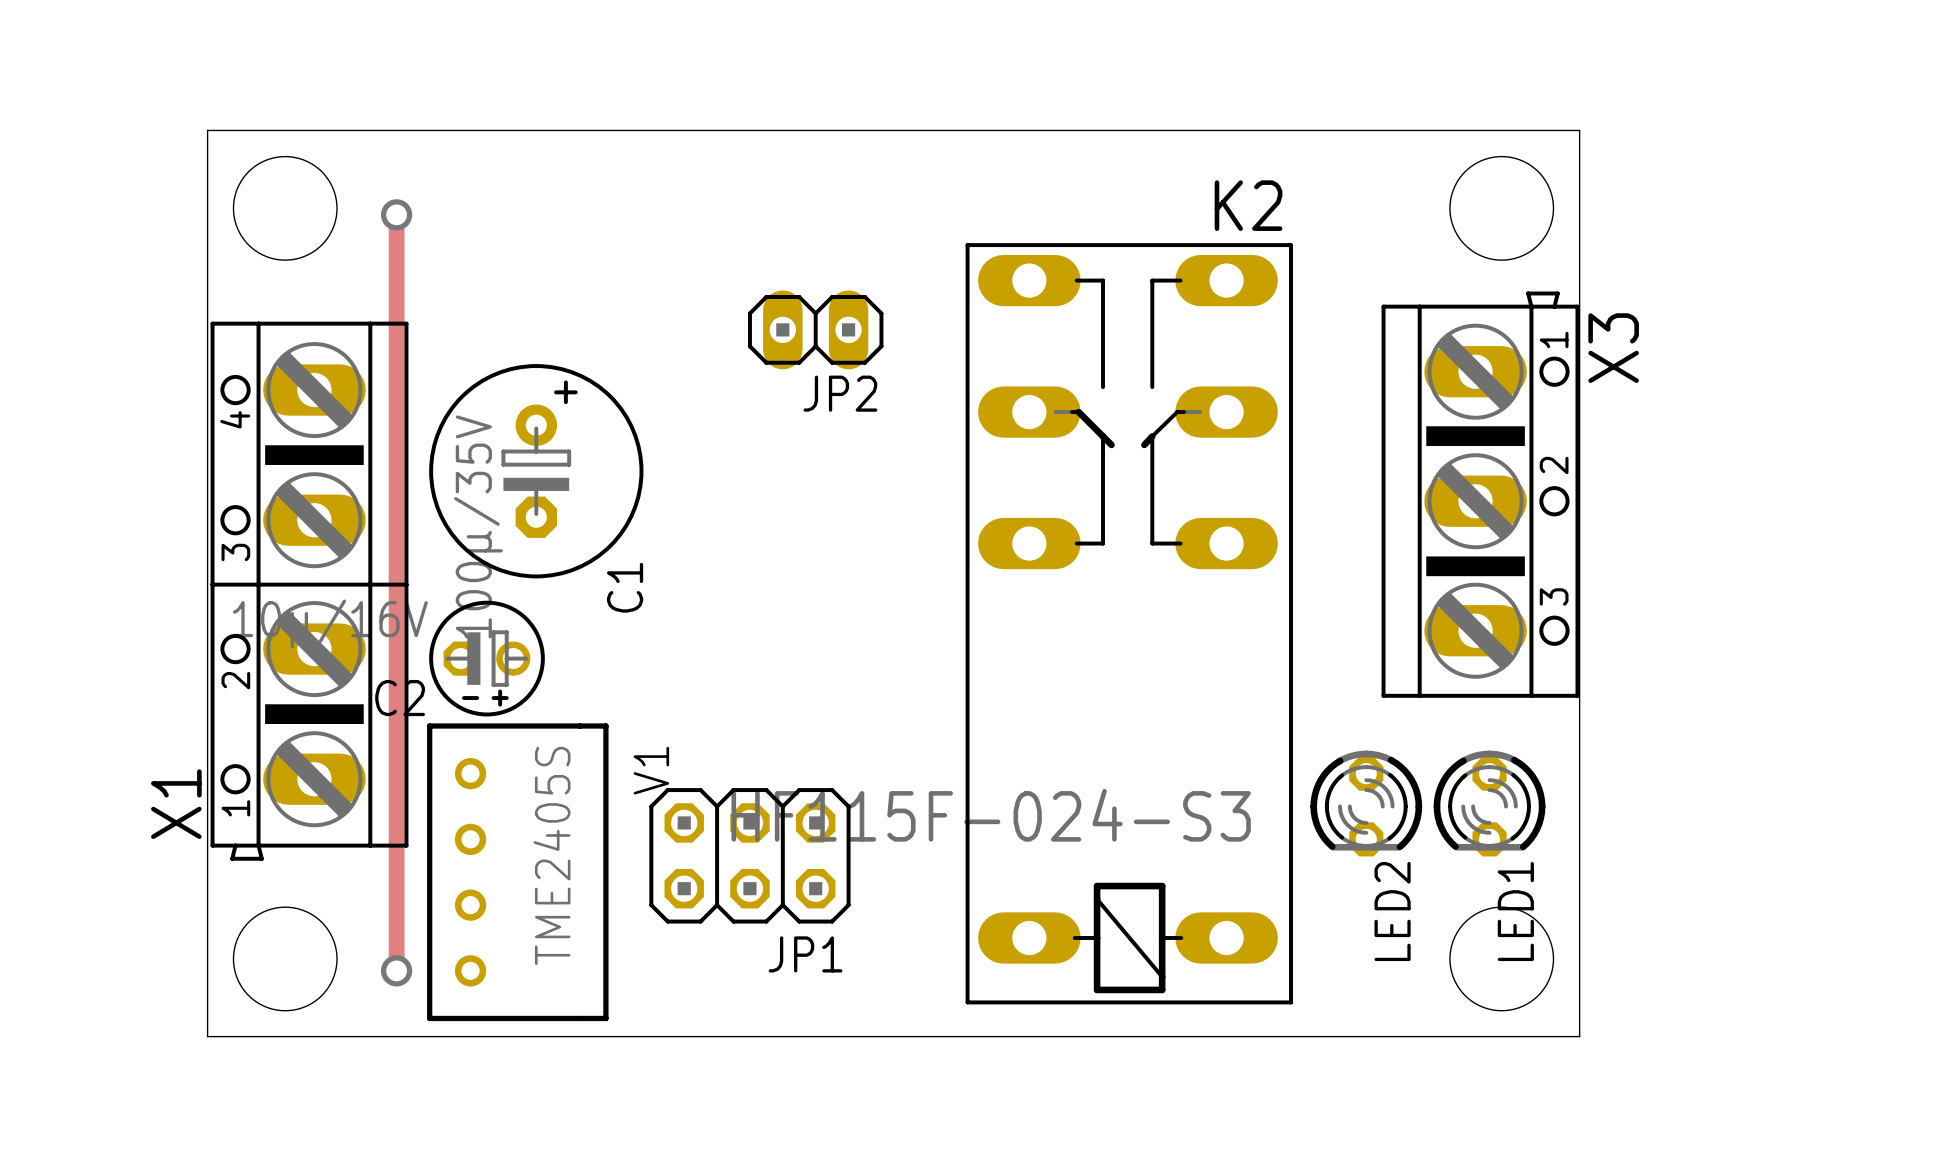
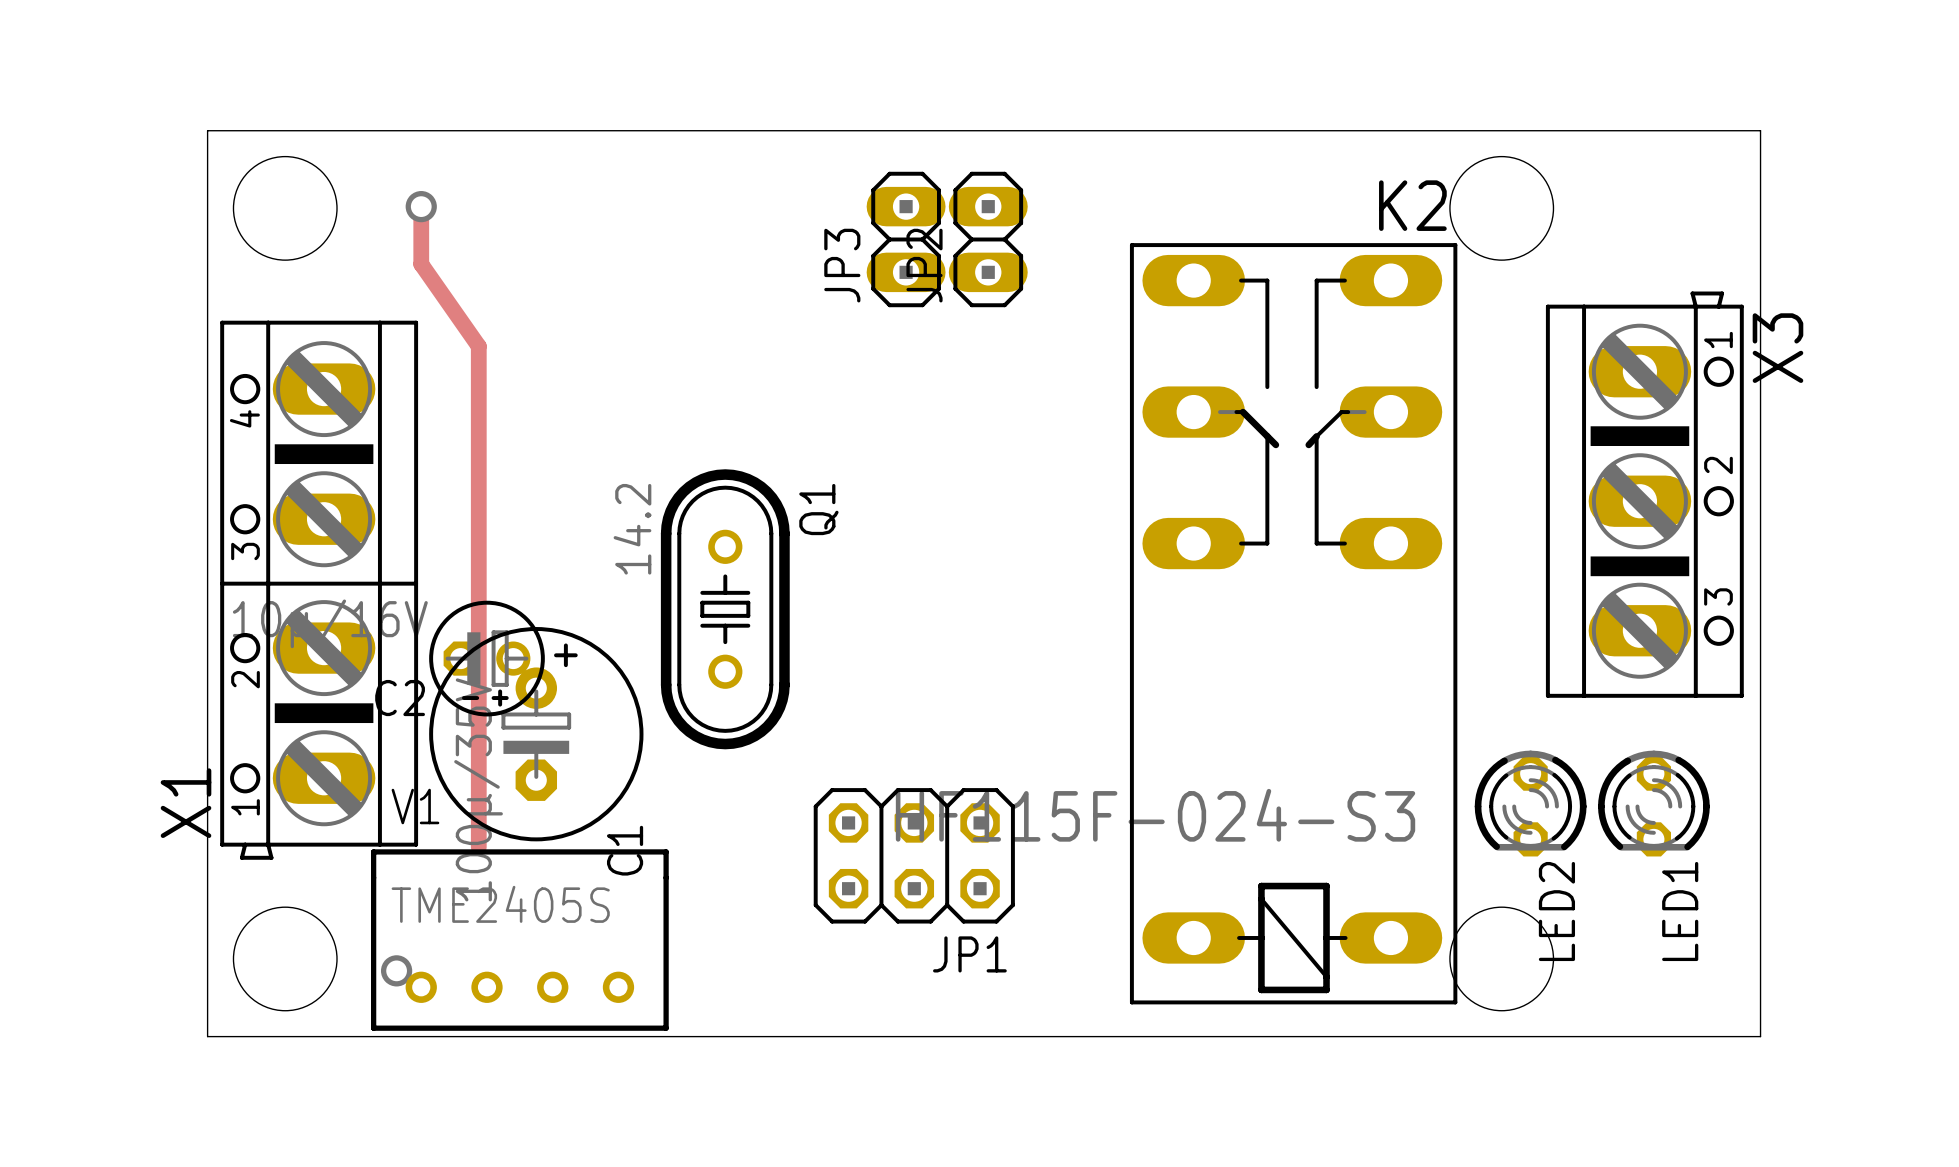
board edge: (207, 130) (1579, 130) (1579, 1036) -> (207, 130) (1760, 130) (1760, 1036) (1579, 1036)
track: none -> (421, 206) (421, 264) (478, 346) (478, 847)
track: (396, 214) (396, 970) -> none
via position: (396, 214) -> (421, 206)
JP3: none -> (906, 239)
X1 footprint: [210, 321, 409, 861] -> [220, 320, 419, 860]
JP2 rotation: 0° (815, 329) -> 90° clockwise (988, 239)
JP2 position: (815, 329) -> (988, 239)
C1 position: (536, 471) -> (536, 734)
X3 position: (1480, 494) -> (1644, 494)
Q1: none -> 14.2 (725, 609)
K2 position: (1129, 623) -> (1293, 623)
LED2 position: (1366, 803) -> (1530, 803)
LED1 position: (1489, 803) -> (1653, 803)
JP1 position: (749, 855) -> (914, 855)
V1 rotation: 0° (517, 872) -> 90° counterclockwise (519, 940)

